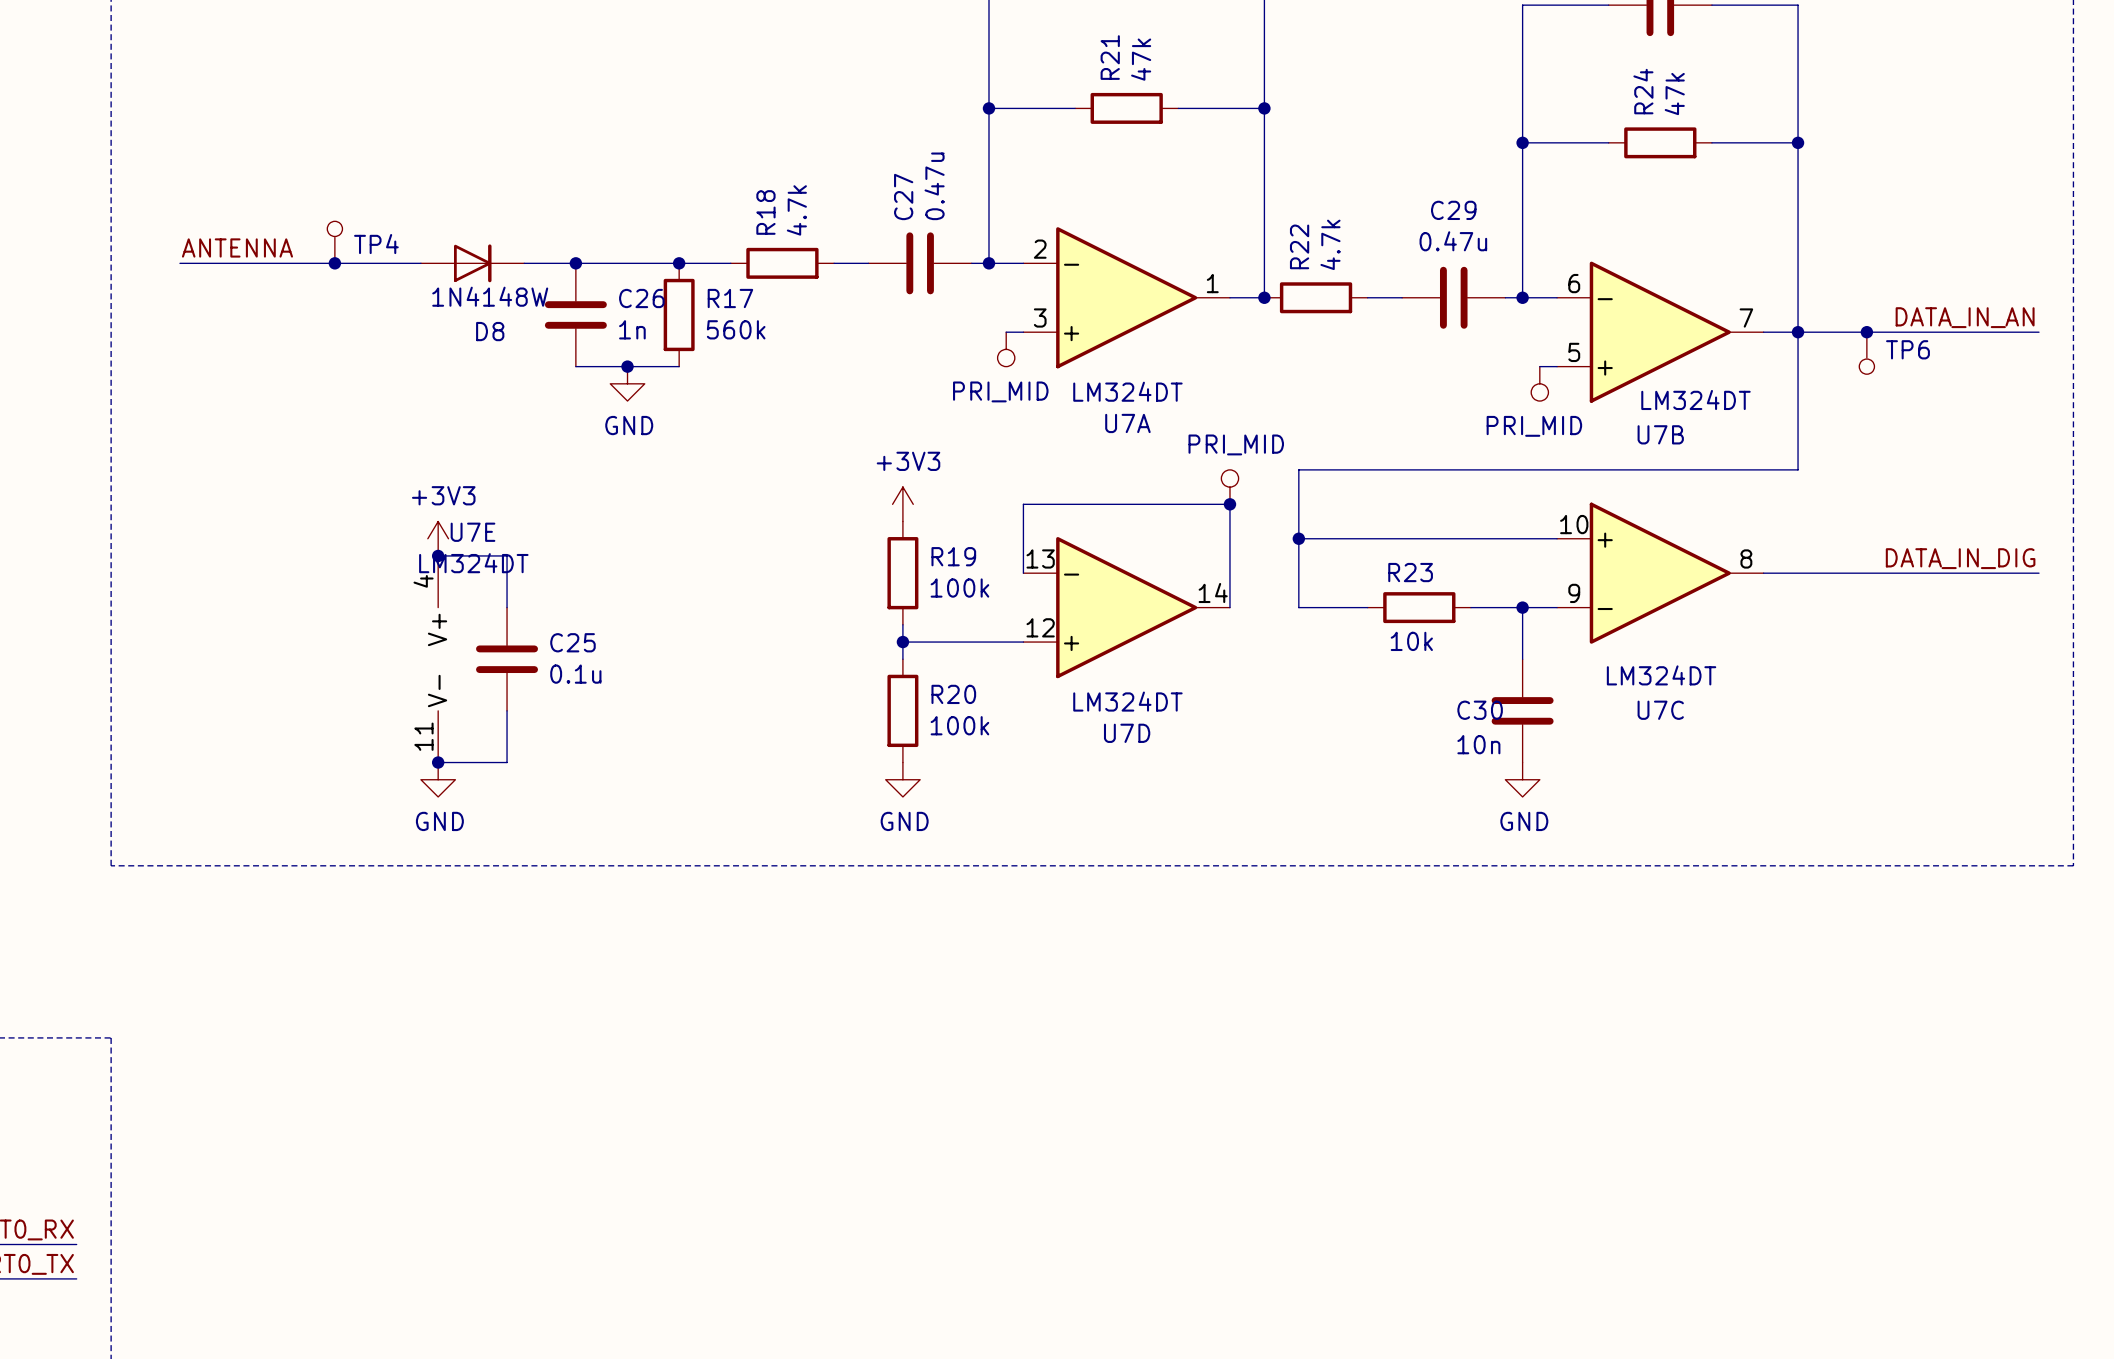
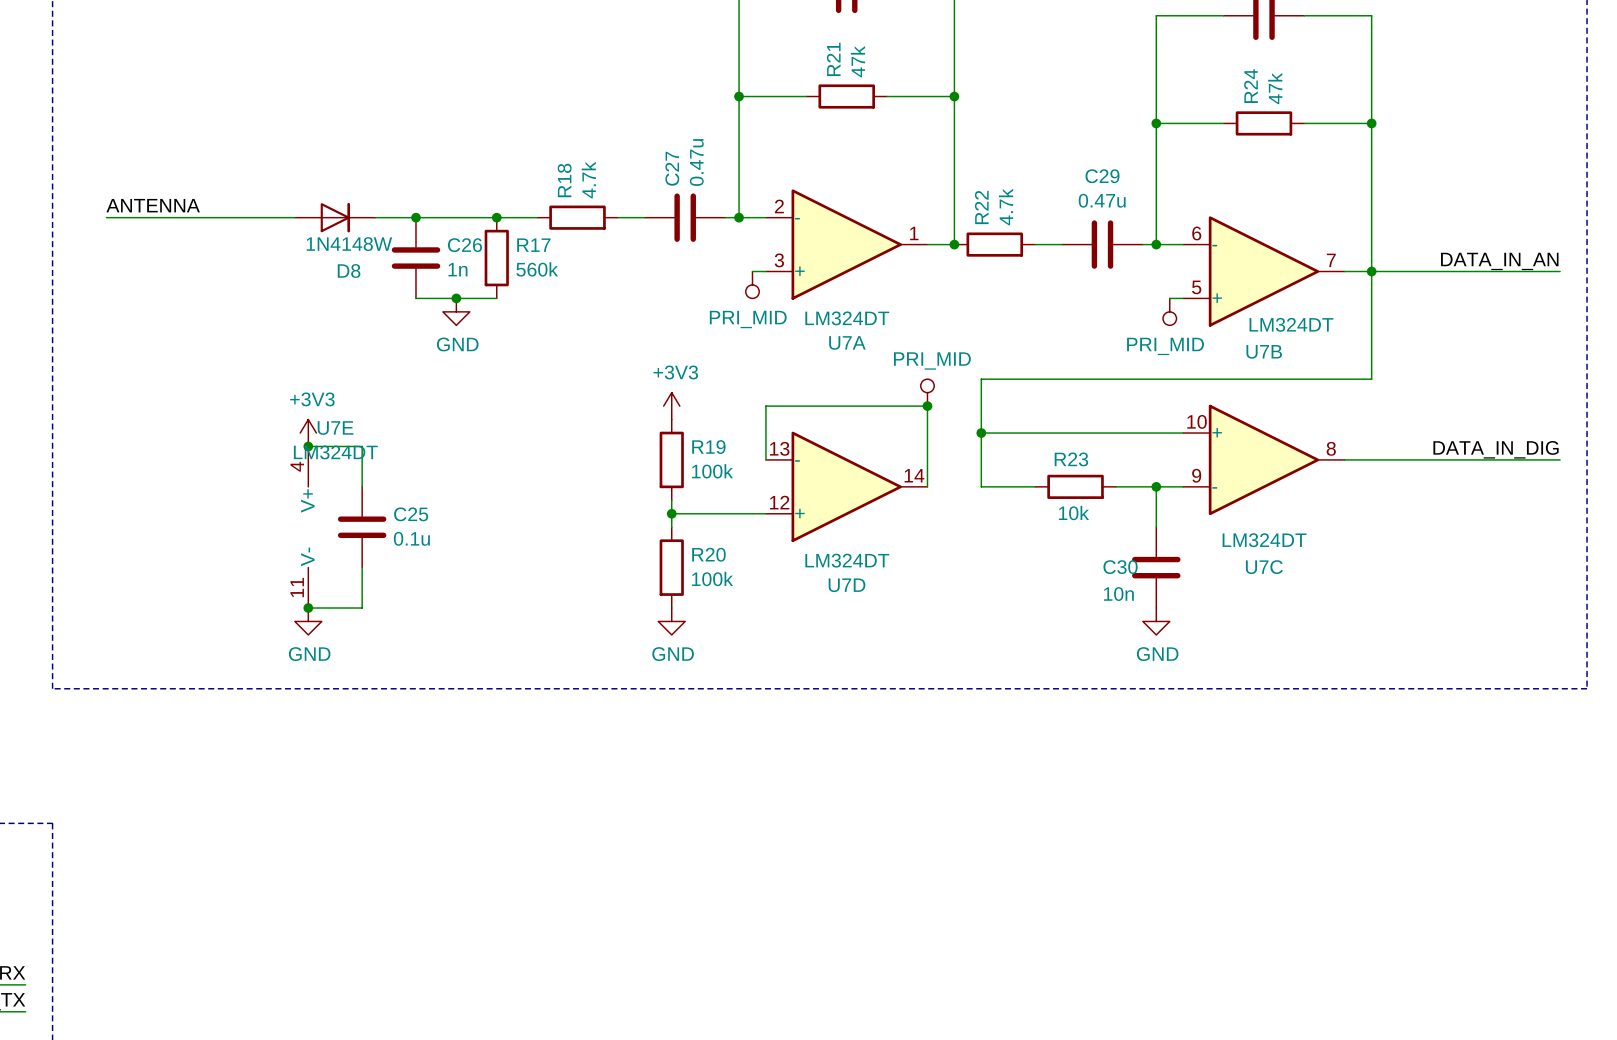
TP4: (334, 242) -> none
junction: (334, 263) -> none
junction: (1866, 332) -> none
TP6: (1866, 353) -> none

